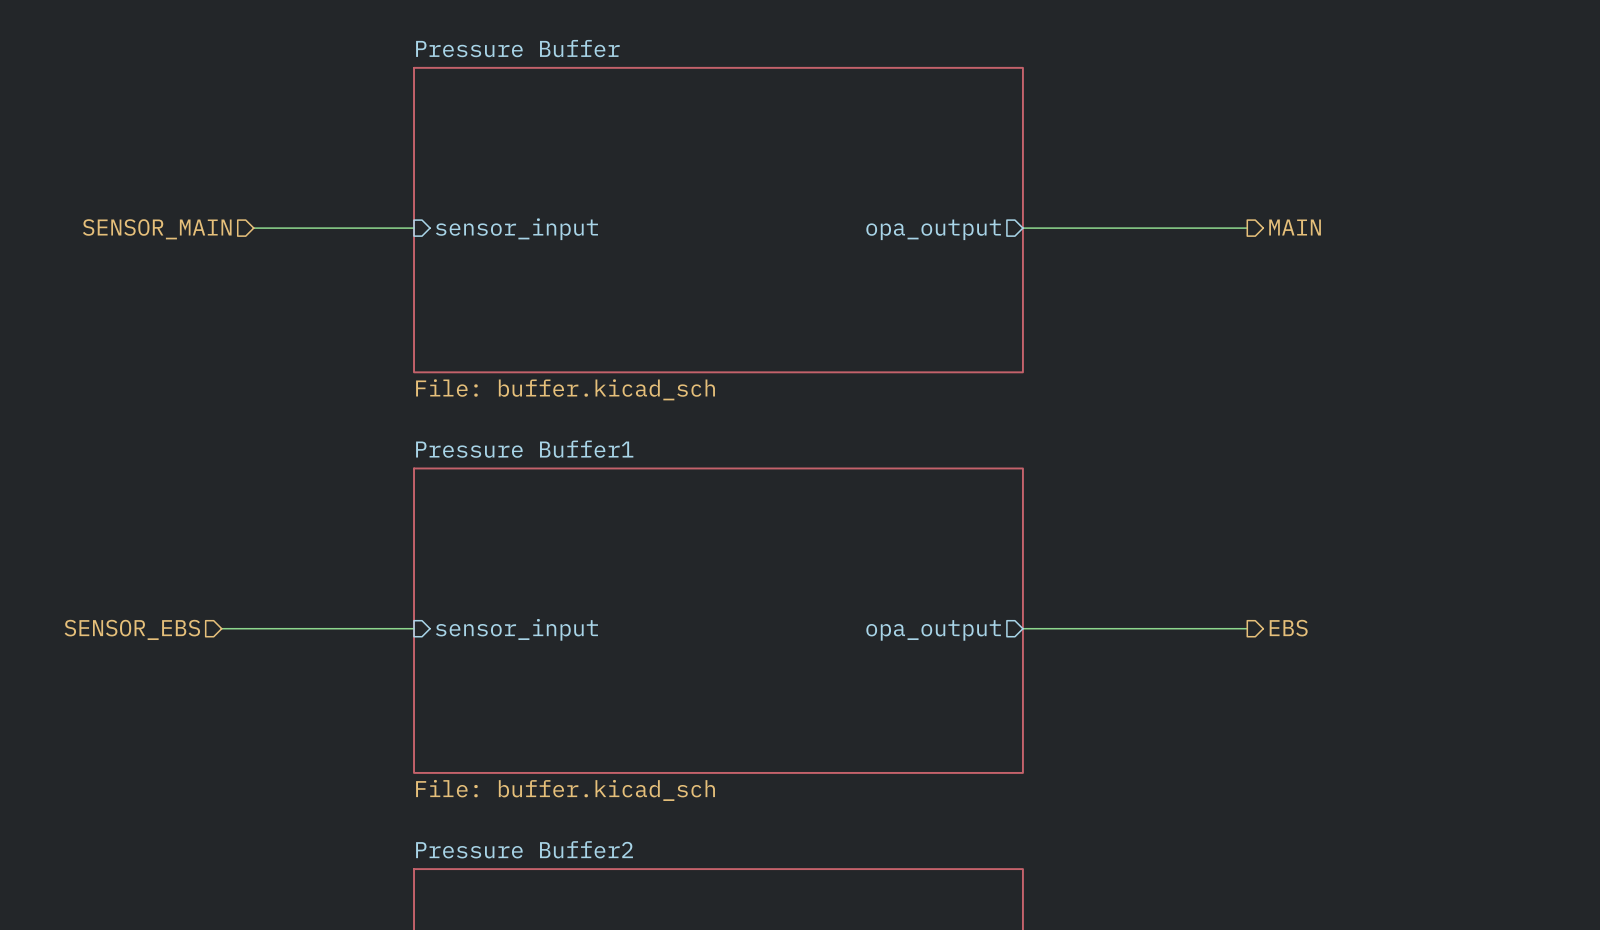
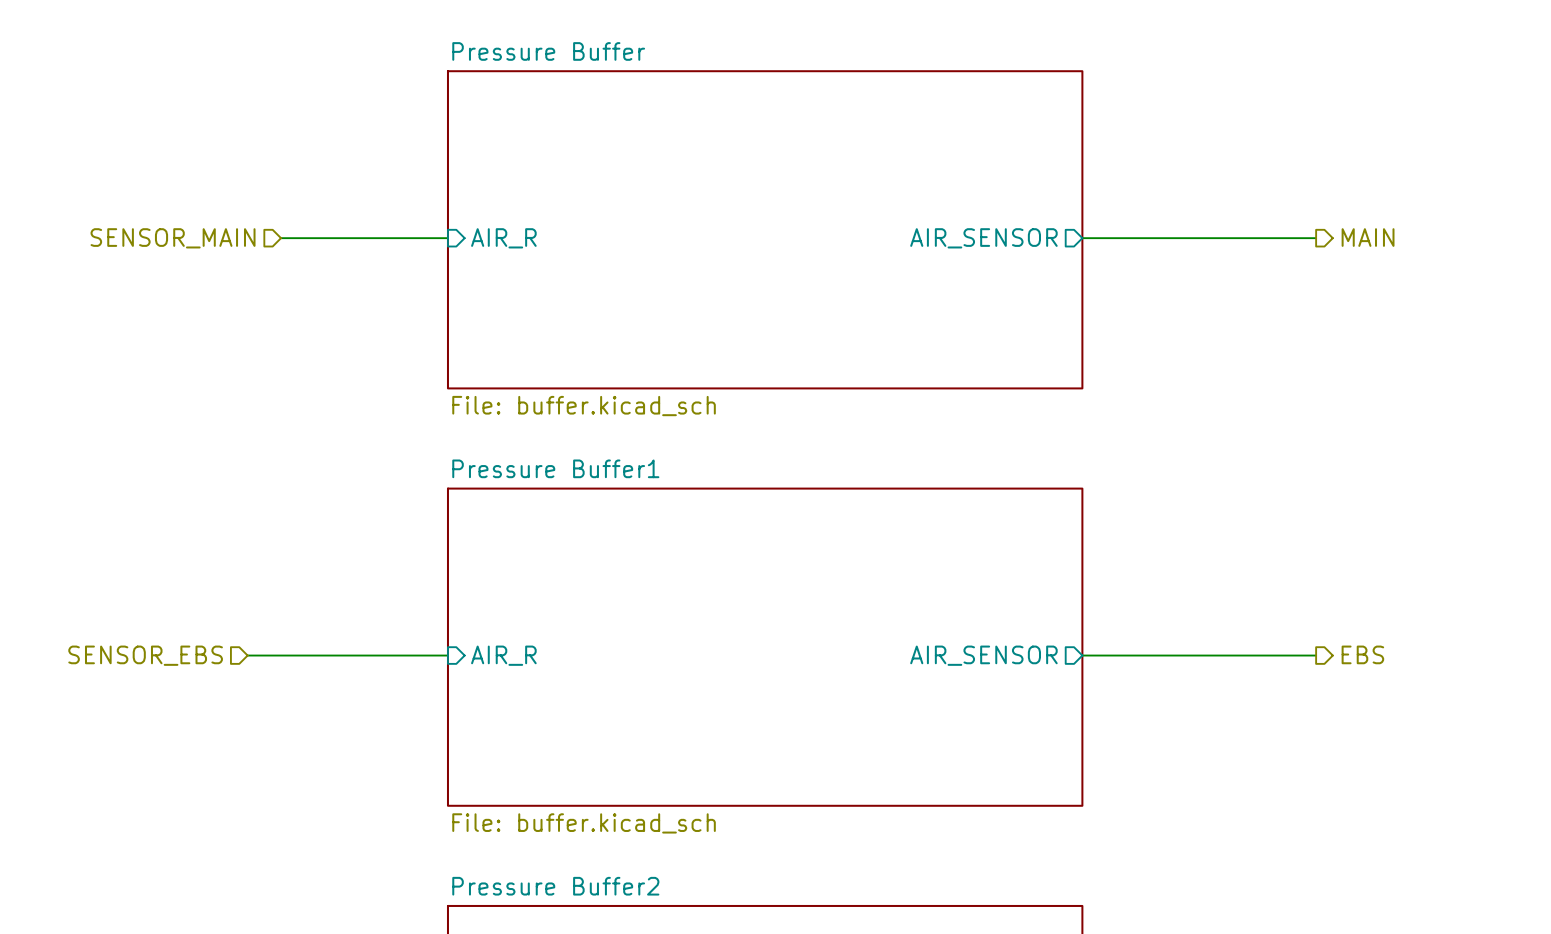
sheet pin: sensor_input (516, 229) -> AIR_R (503, 238)
sheet pin: opa_output (933, 229) -> AIR_SENSOR (983, 238)
sheet pin: sensor_input (516, 629) -> AIR_R (503, 655)
sheet pin: opa_output (933, 630) -> AIR_SENSOR (983, 655)

